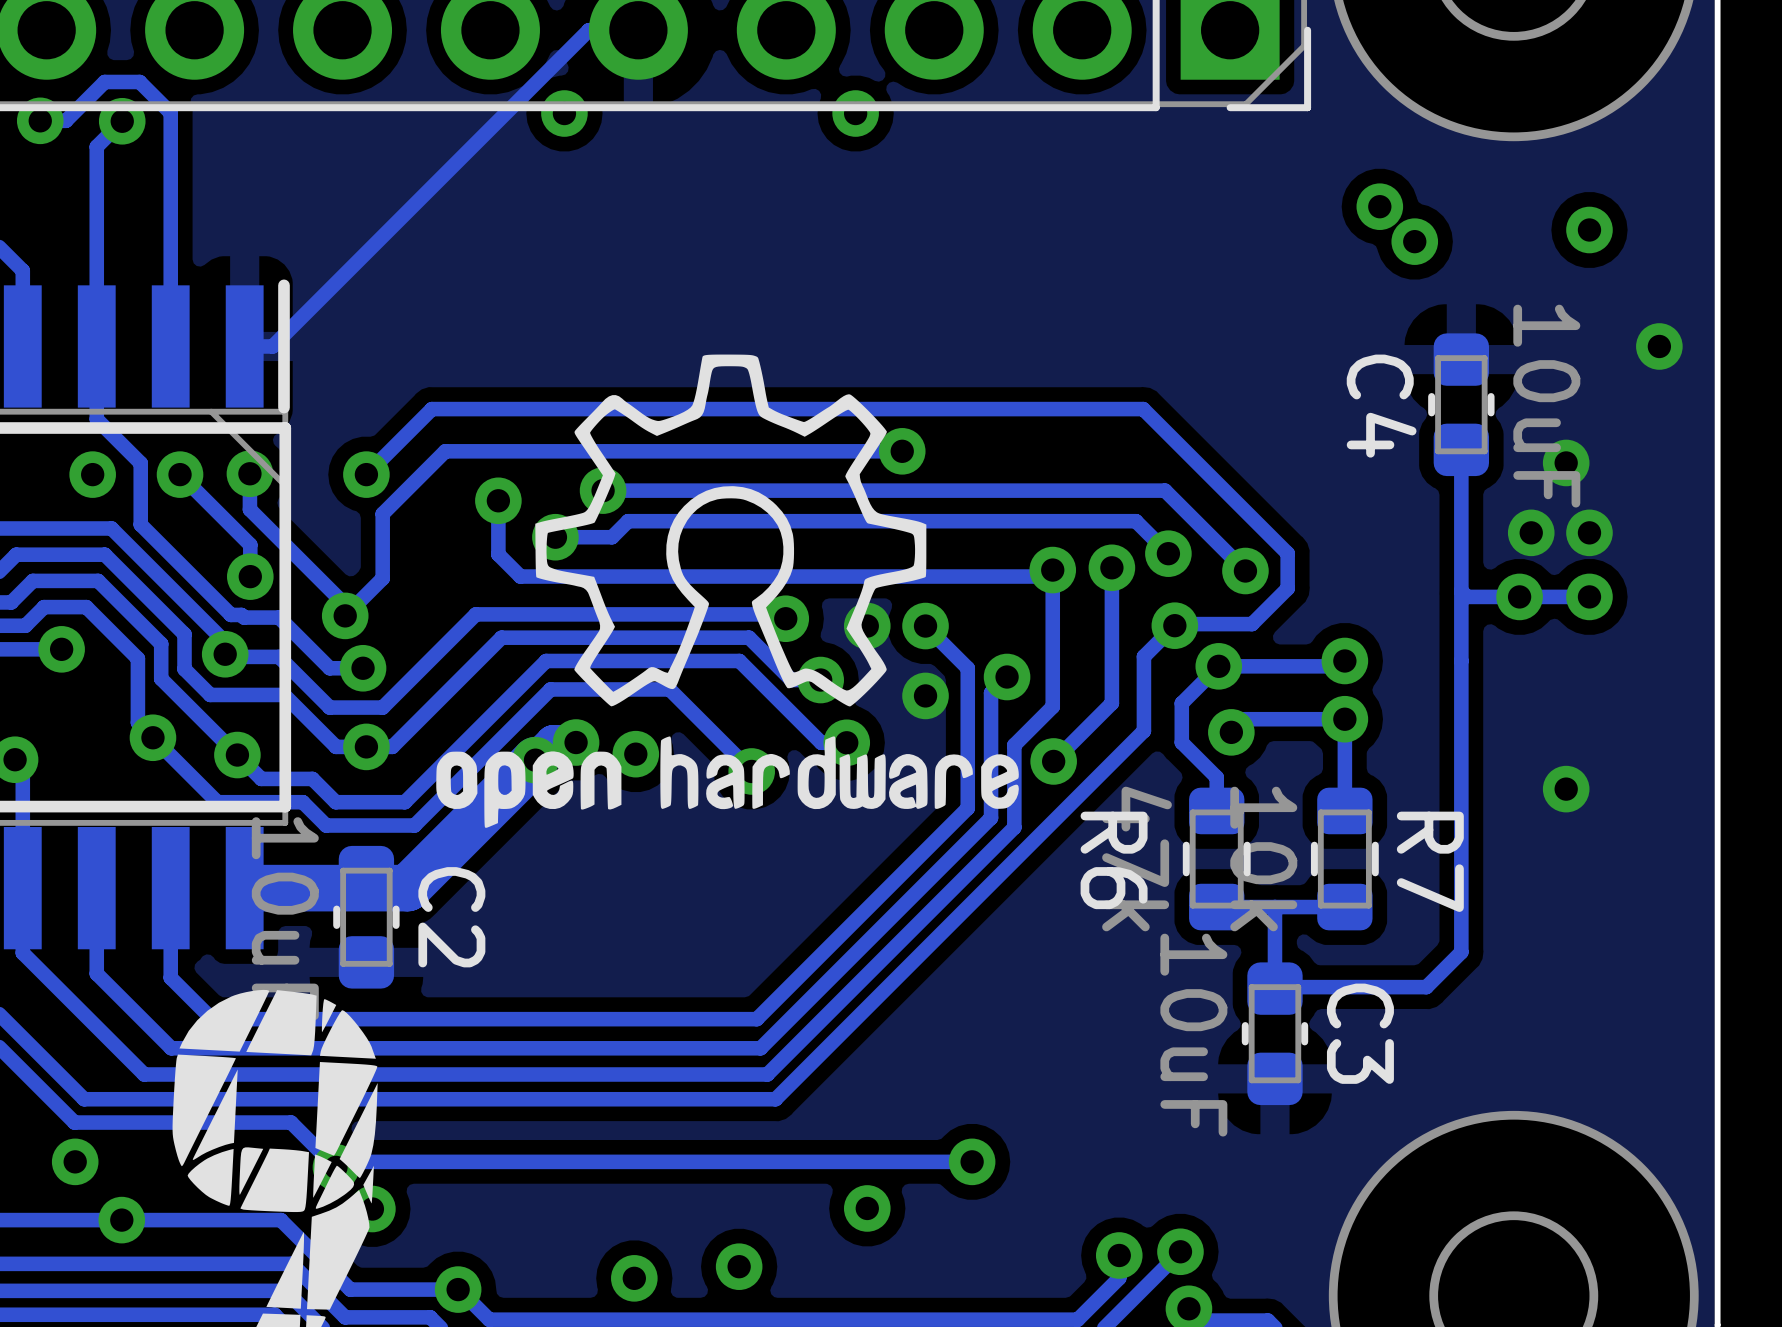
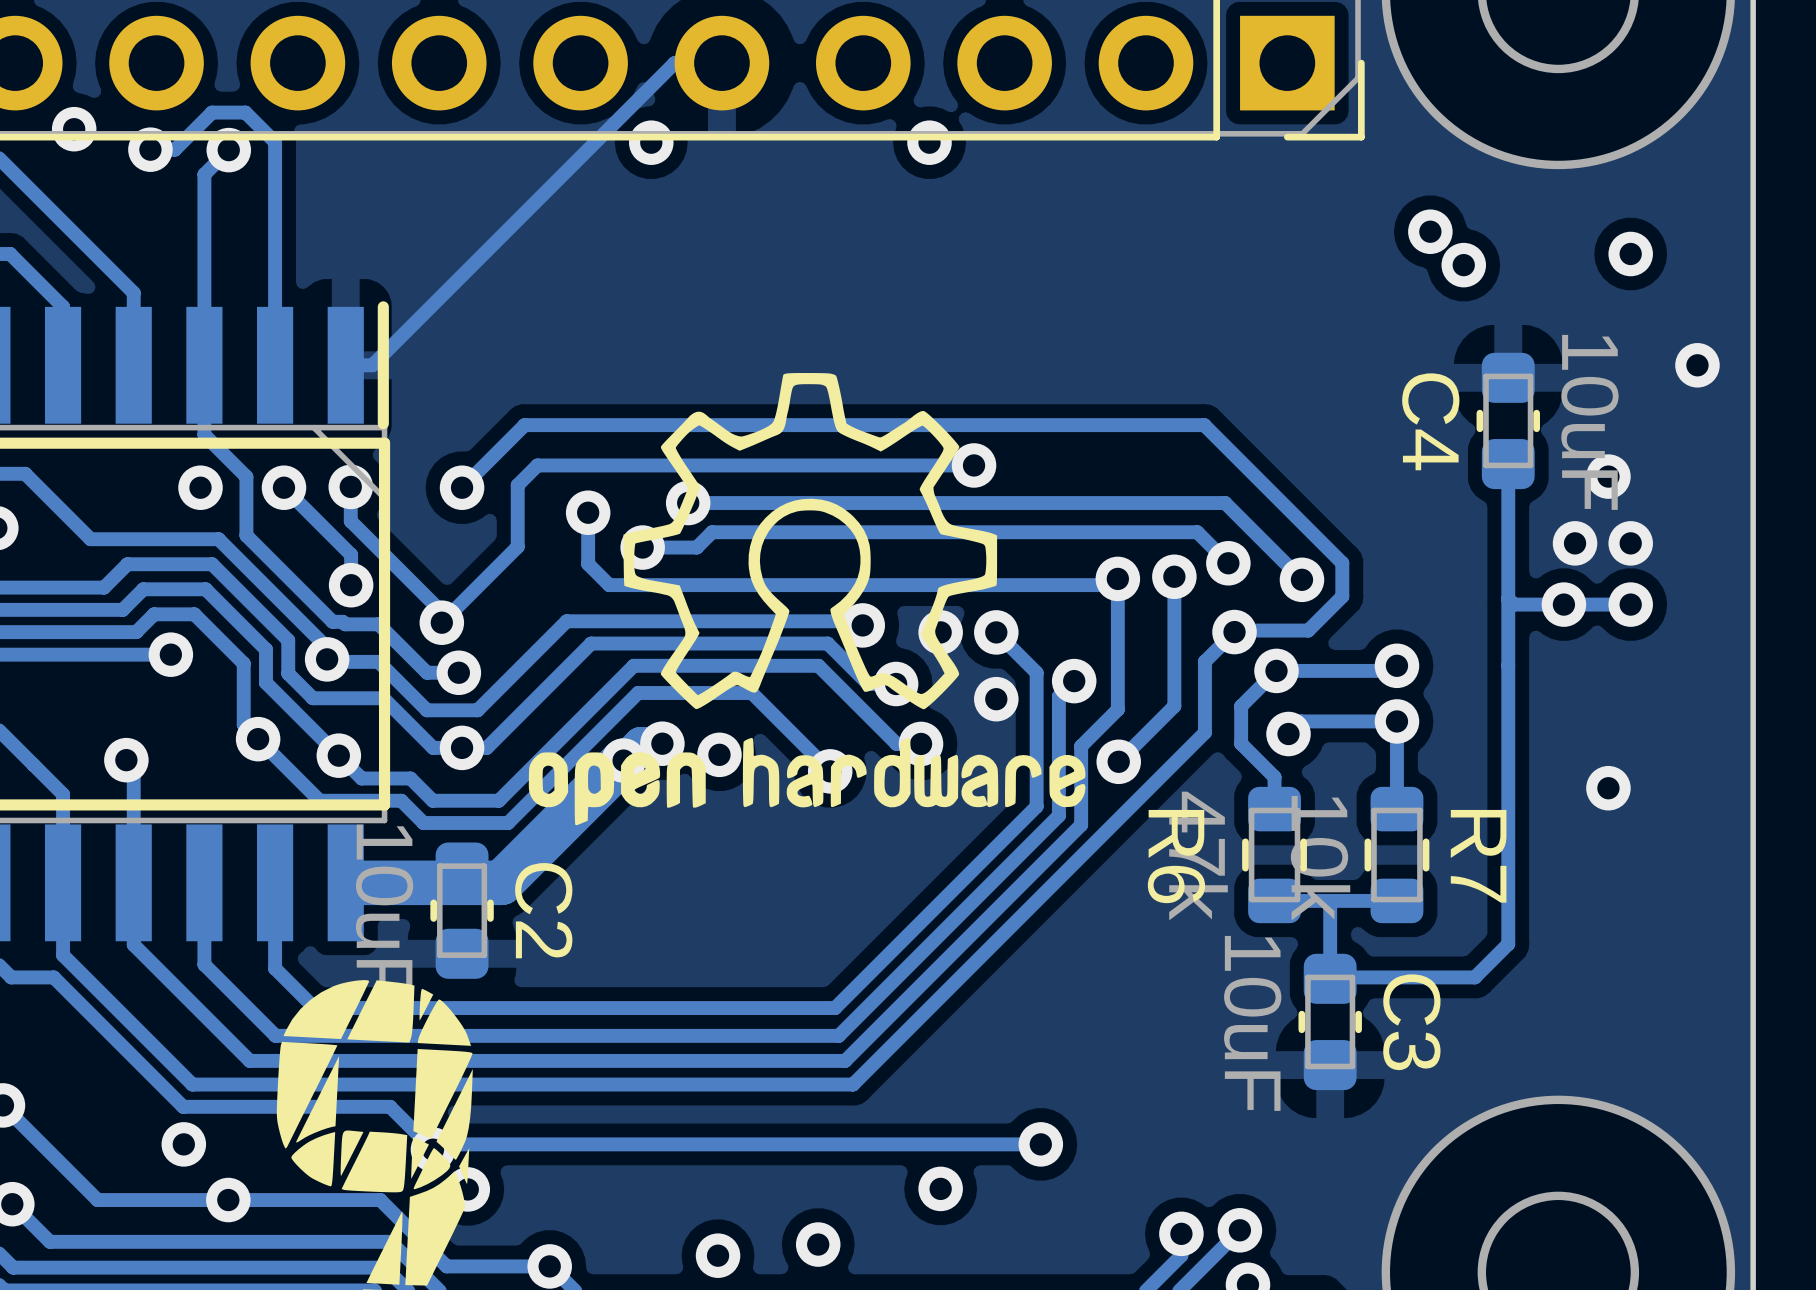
track: (424, 471) (382, 513) (382, 578) -> (517, 485) (517, 546) (477, 586)

